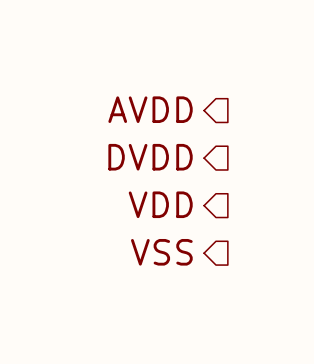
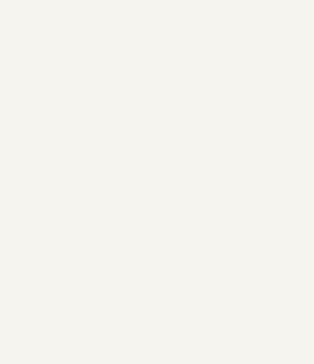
hierarchical label: AVDD (150, 109) -> none
hierarchical label: DVDD (150, 157) -> none
hierarchical label: VDD (160, 204) -> none
hierarchical label: VSS (161, 252) -> none

